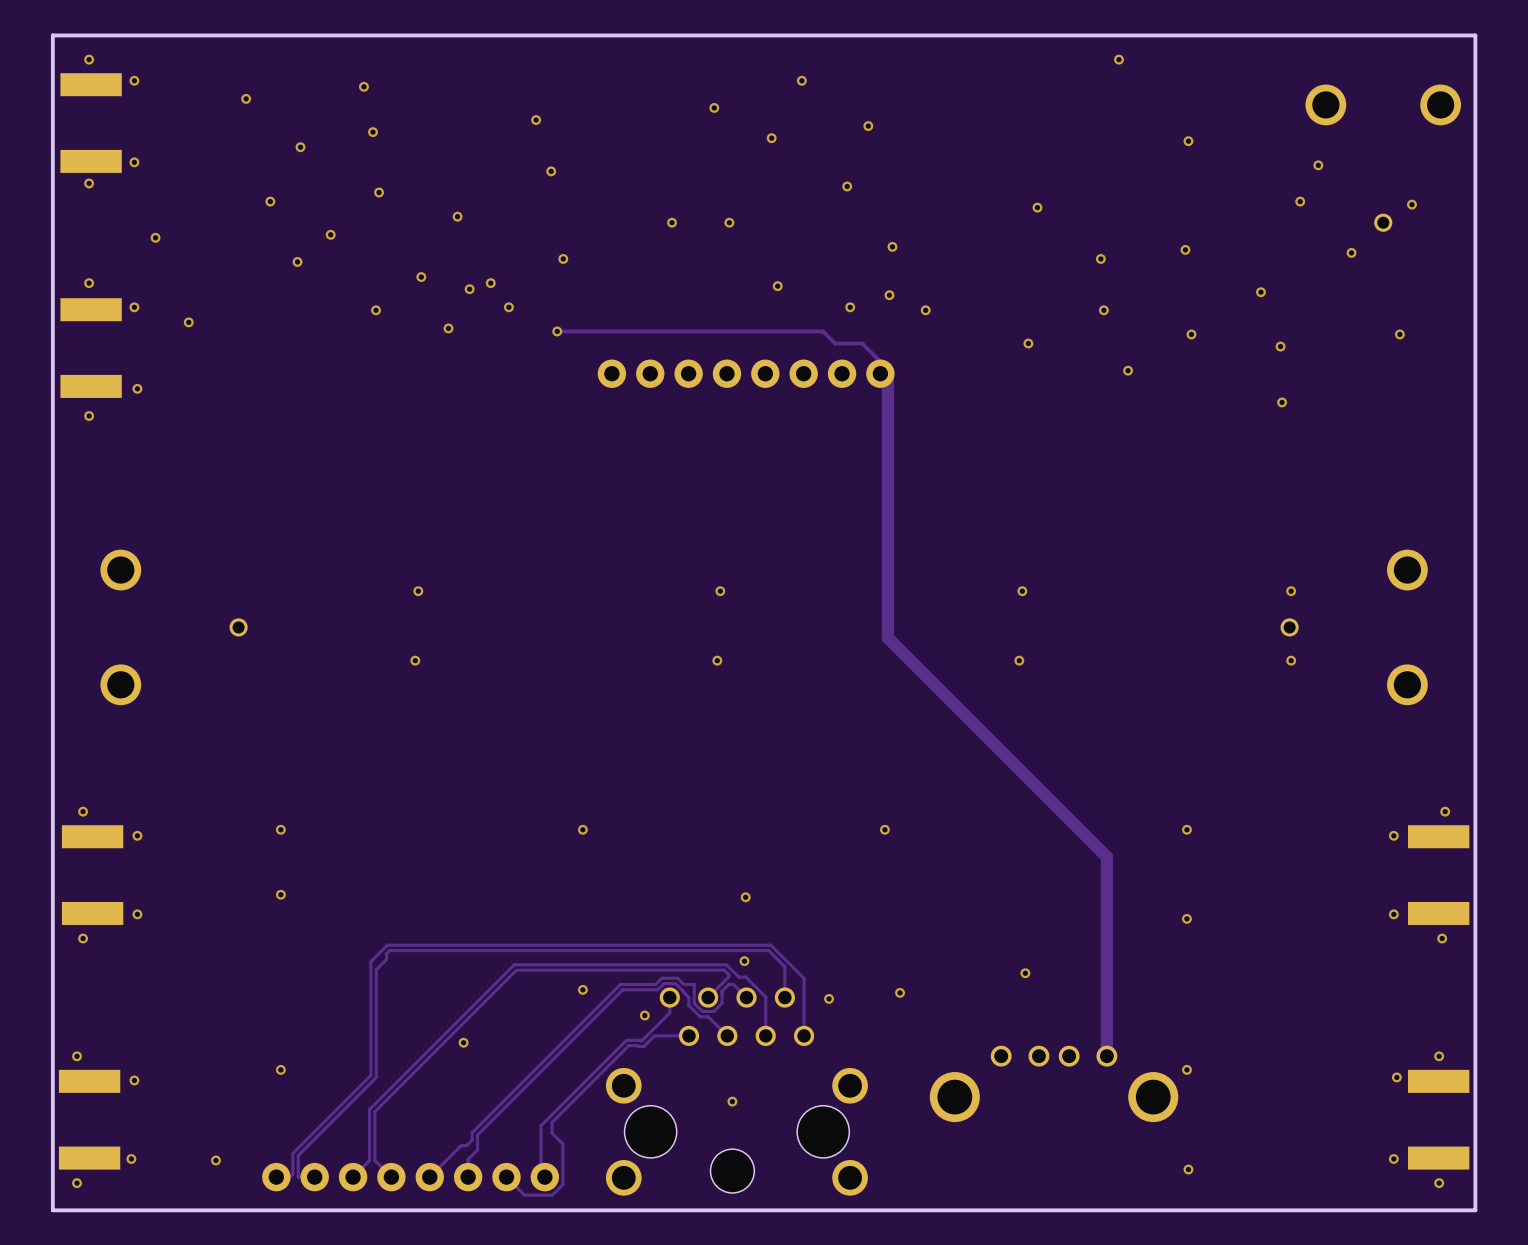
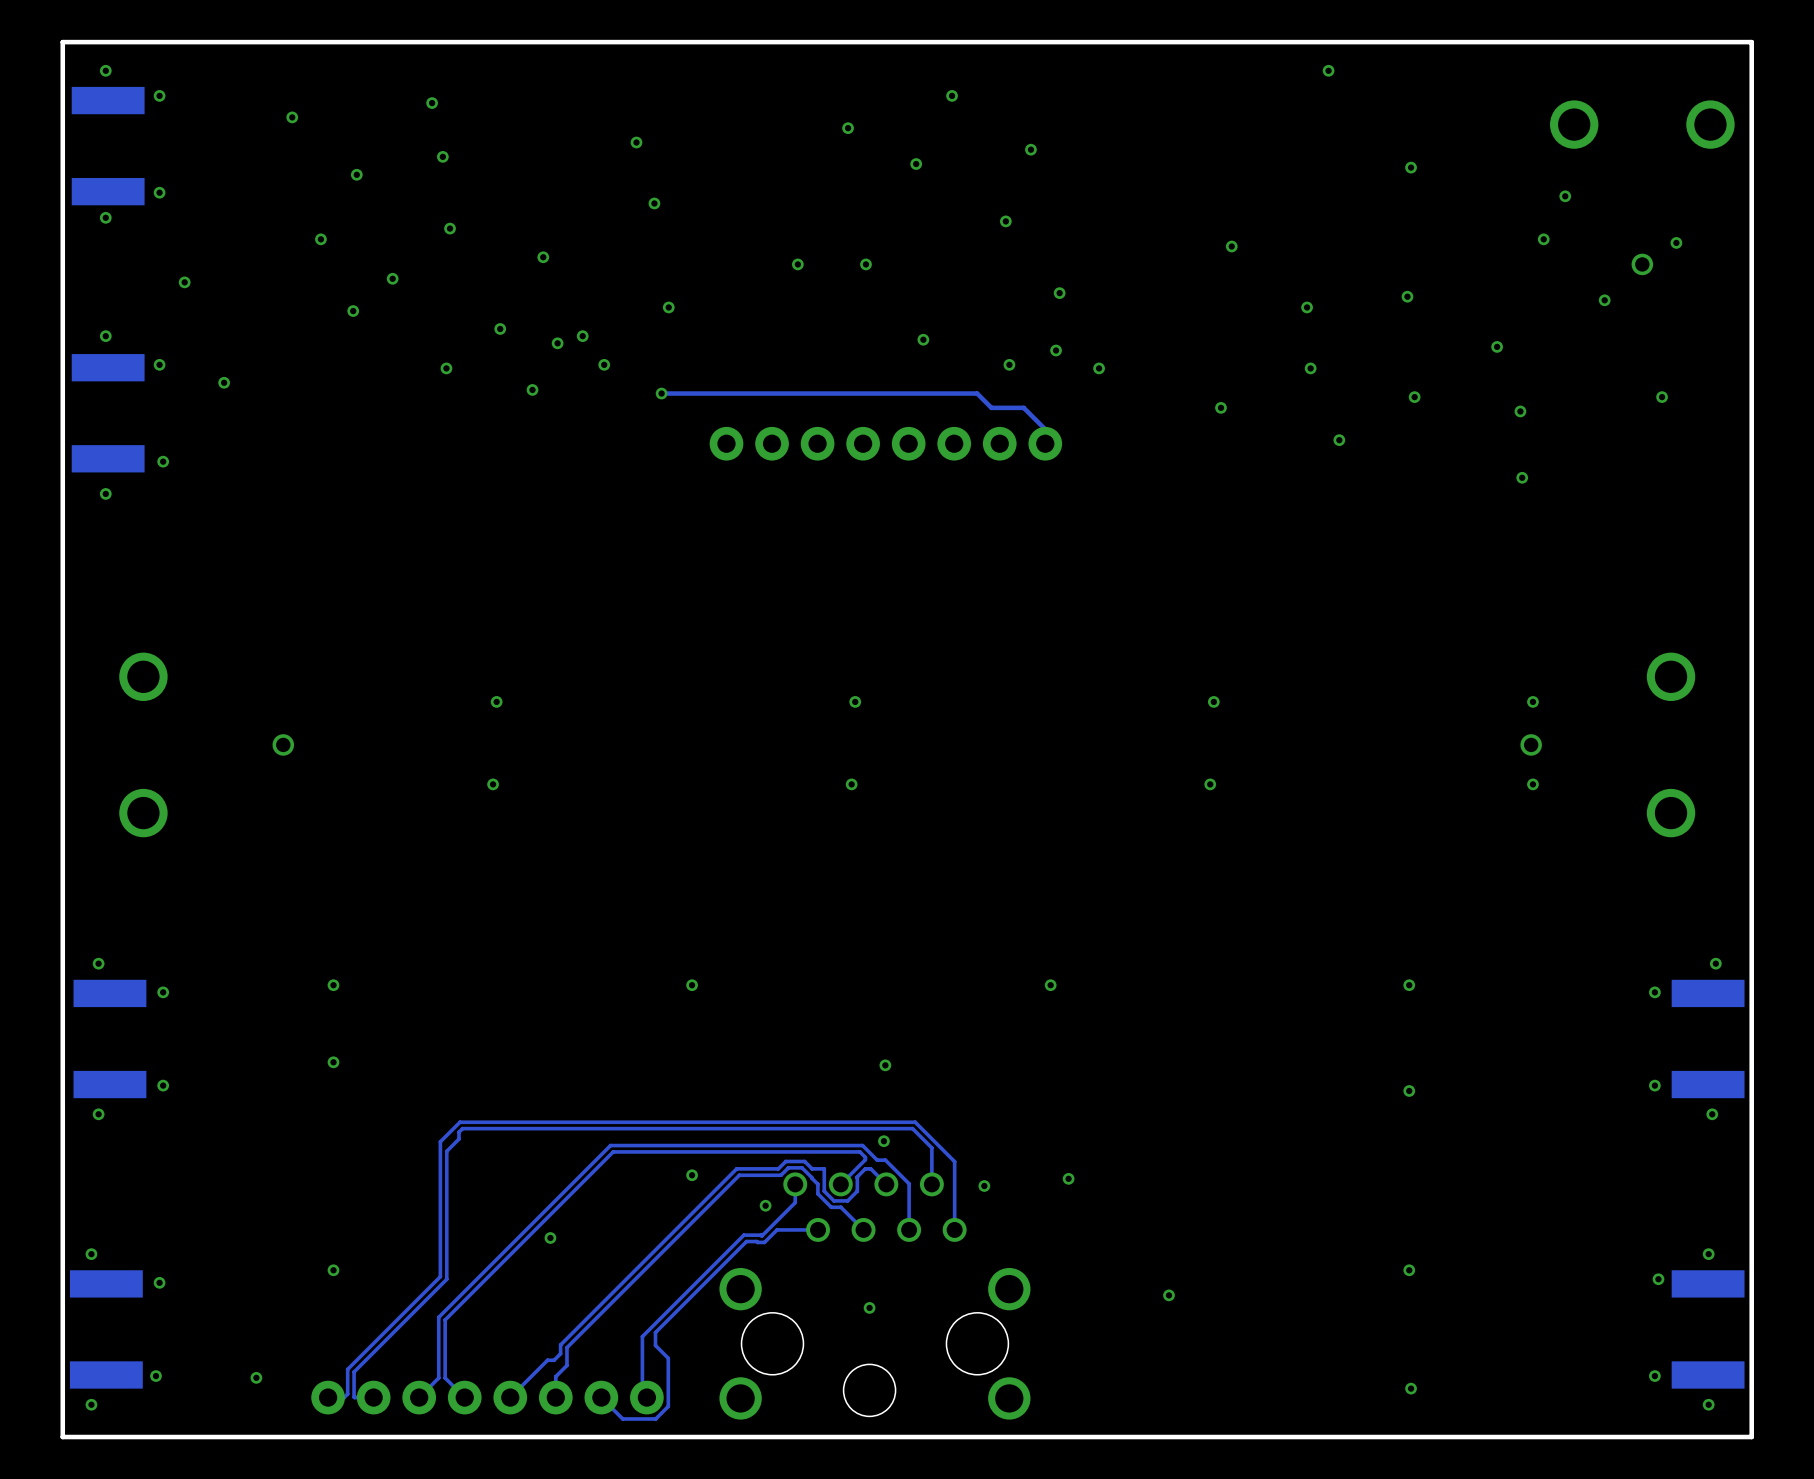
track: (880, 372) (887, 379) (887, 638) (1106, 856) (1106, 1056) -> none
via: (1025, 973) -> none
part: (1054, 1083) -> none
via: none -> (1169, 1295)

